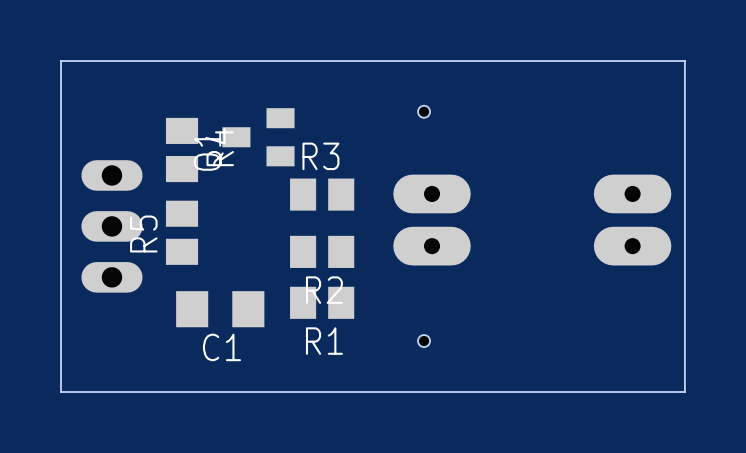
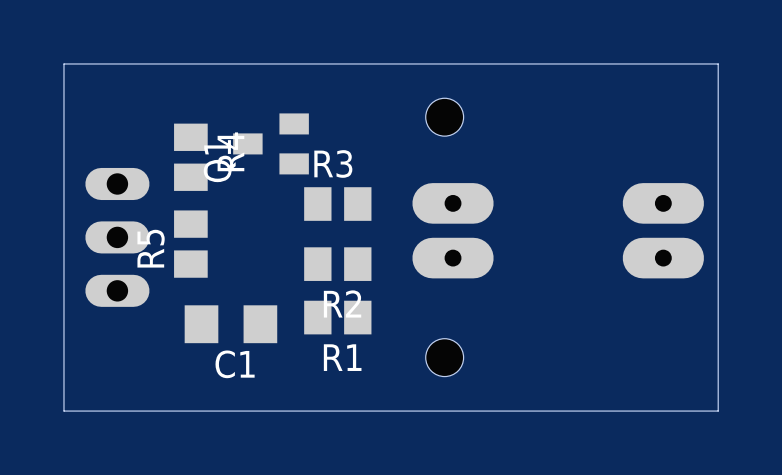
hole size: [418, 105, 431, 118] -> [425, 98, 464, 137]
hole size: [418, 335, 431, 348] -> [425, 338, 464, 377]

